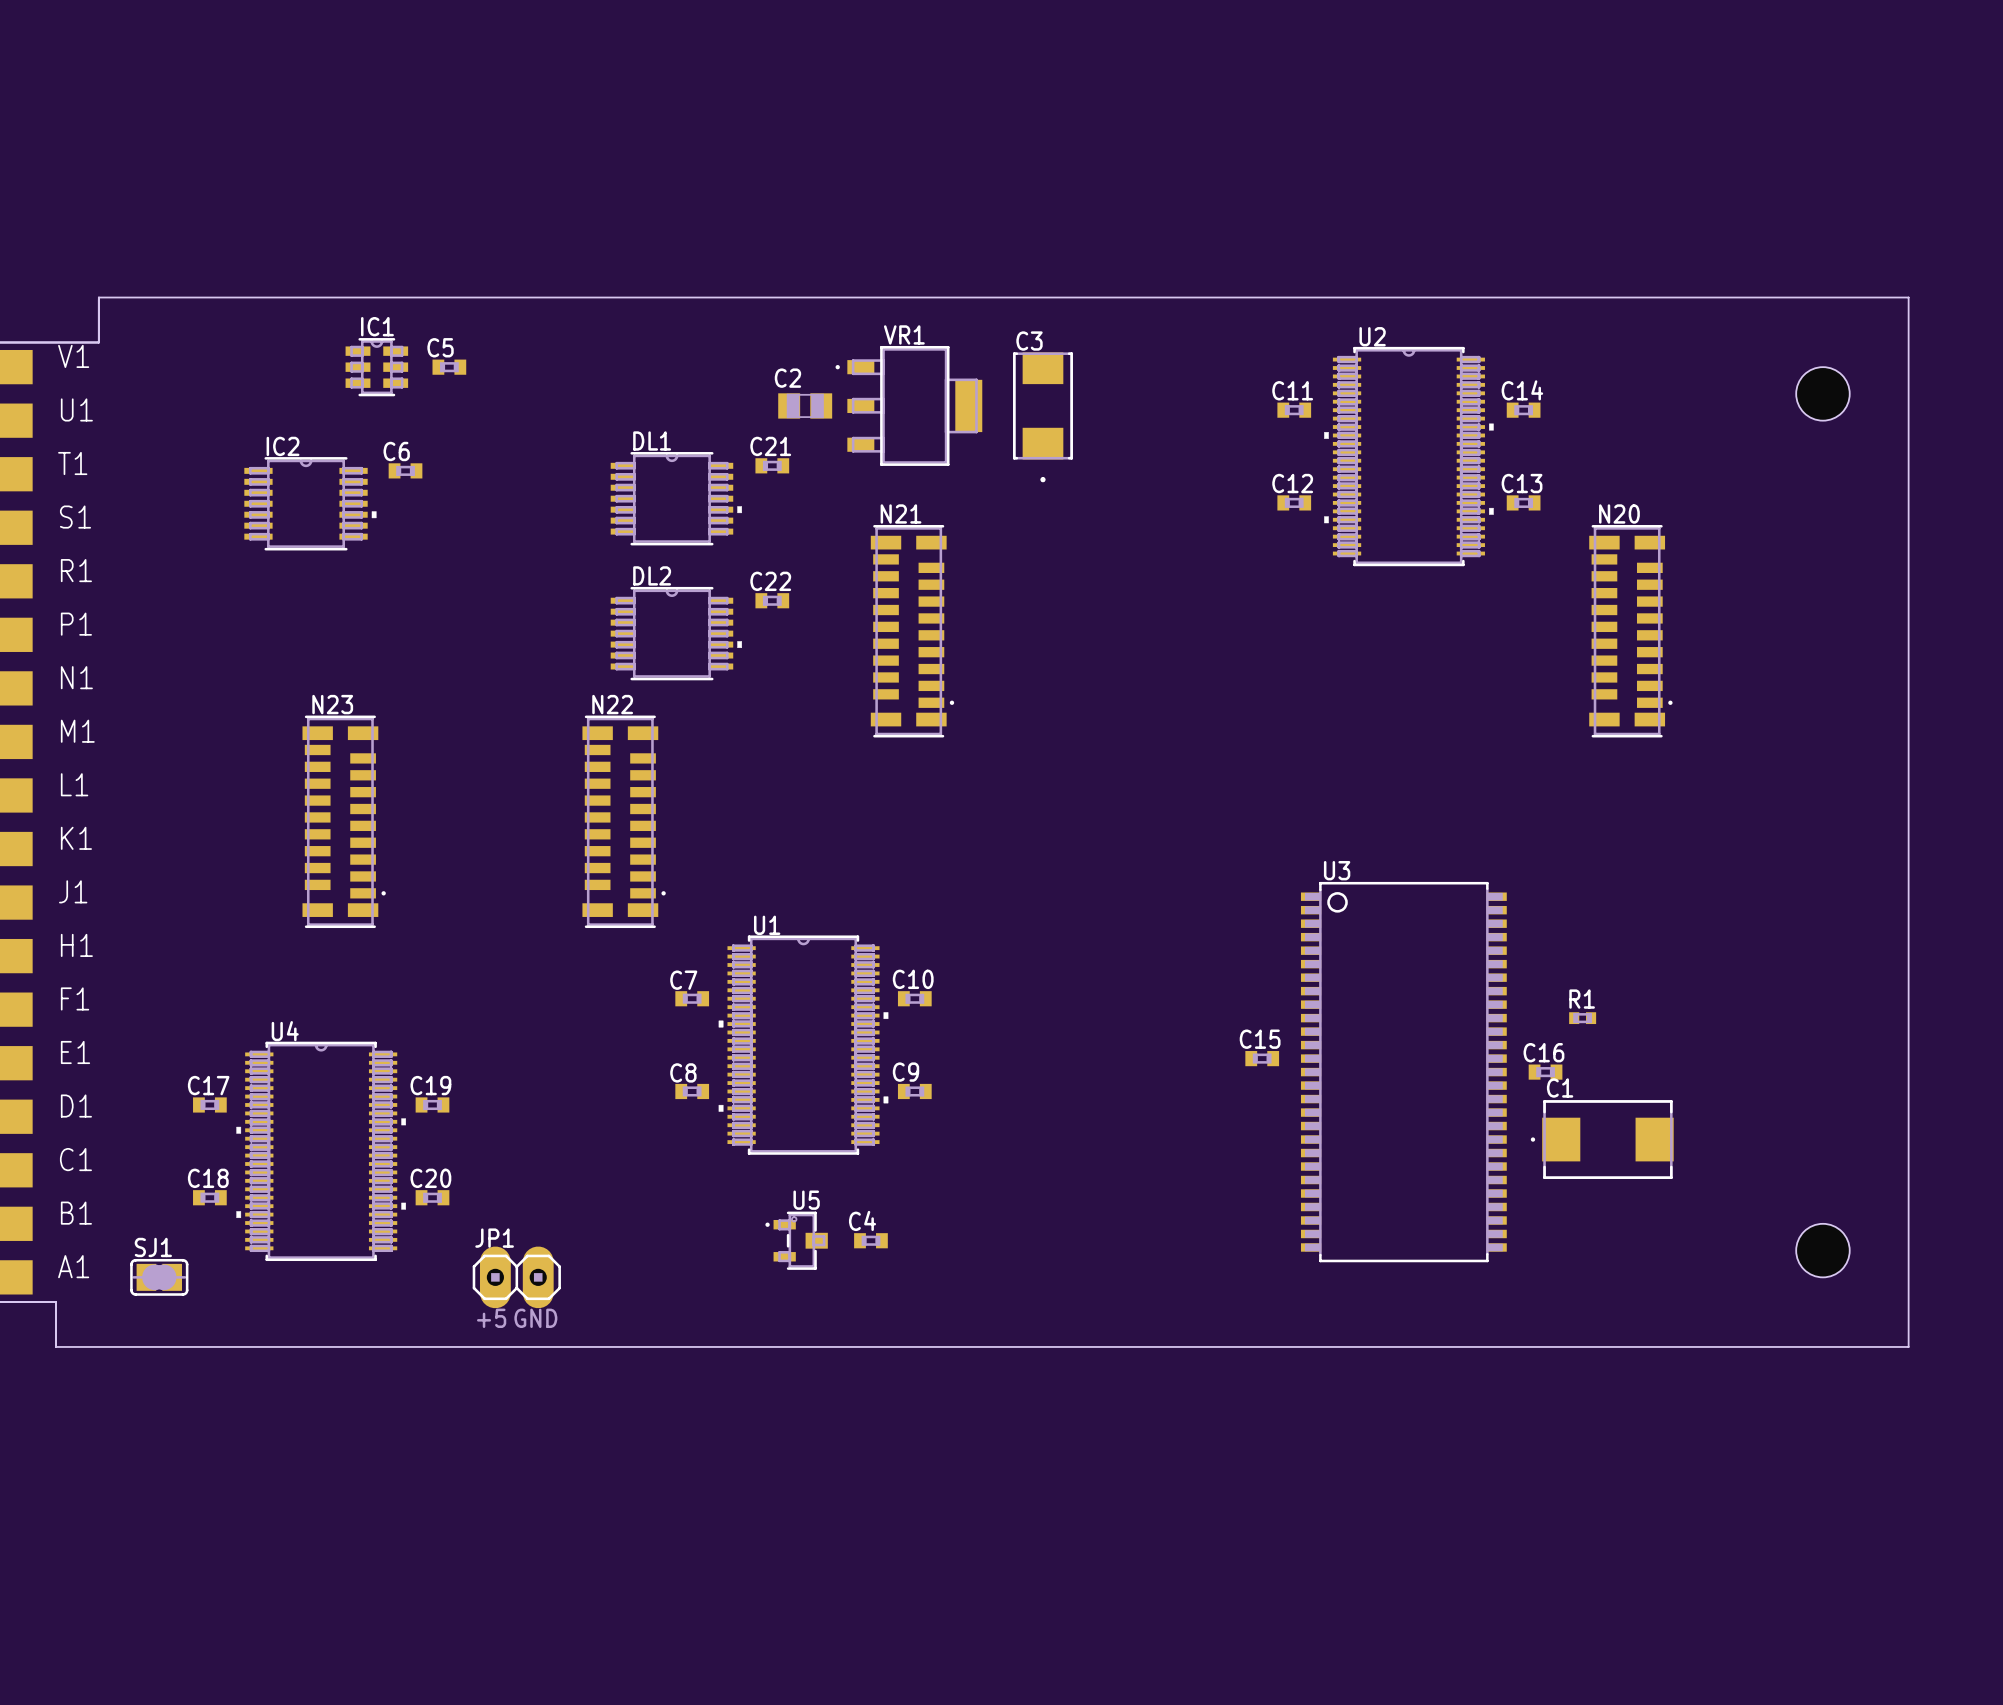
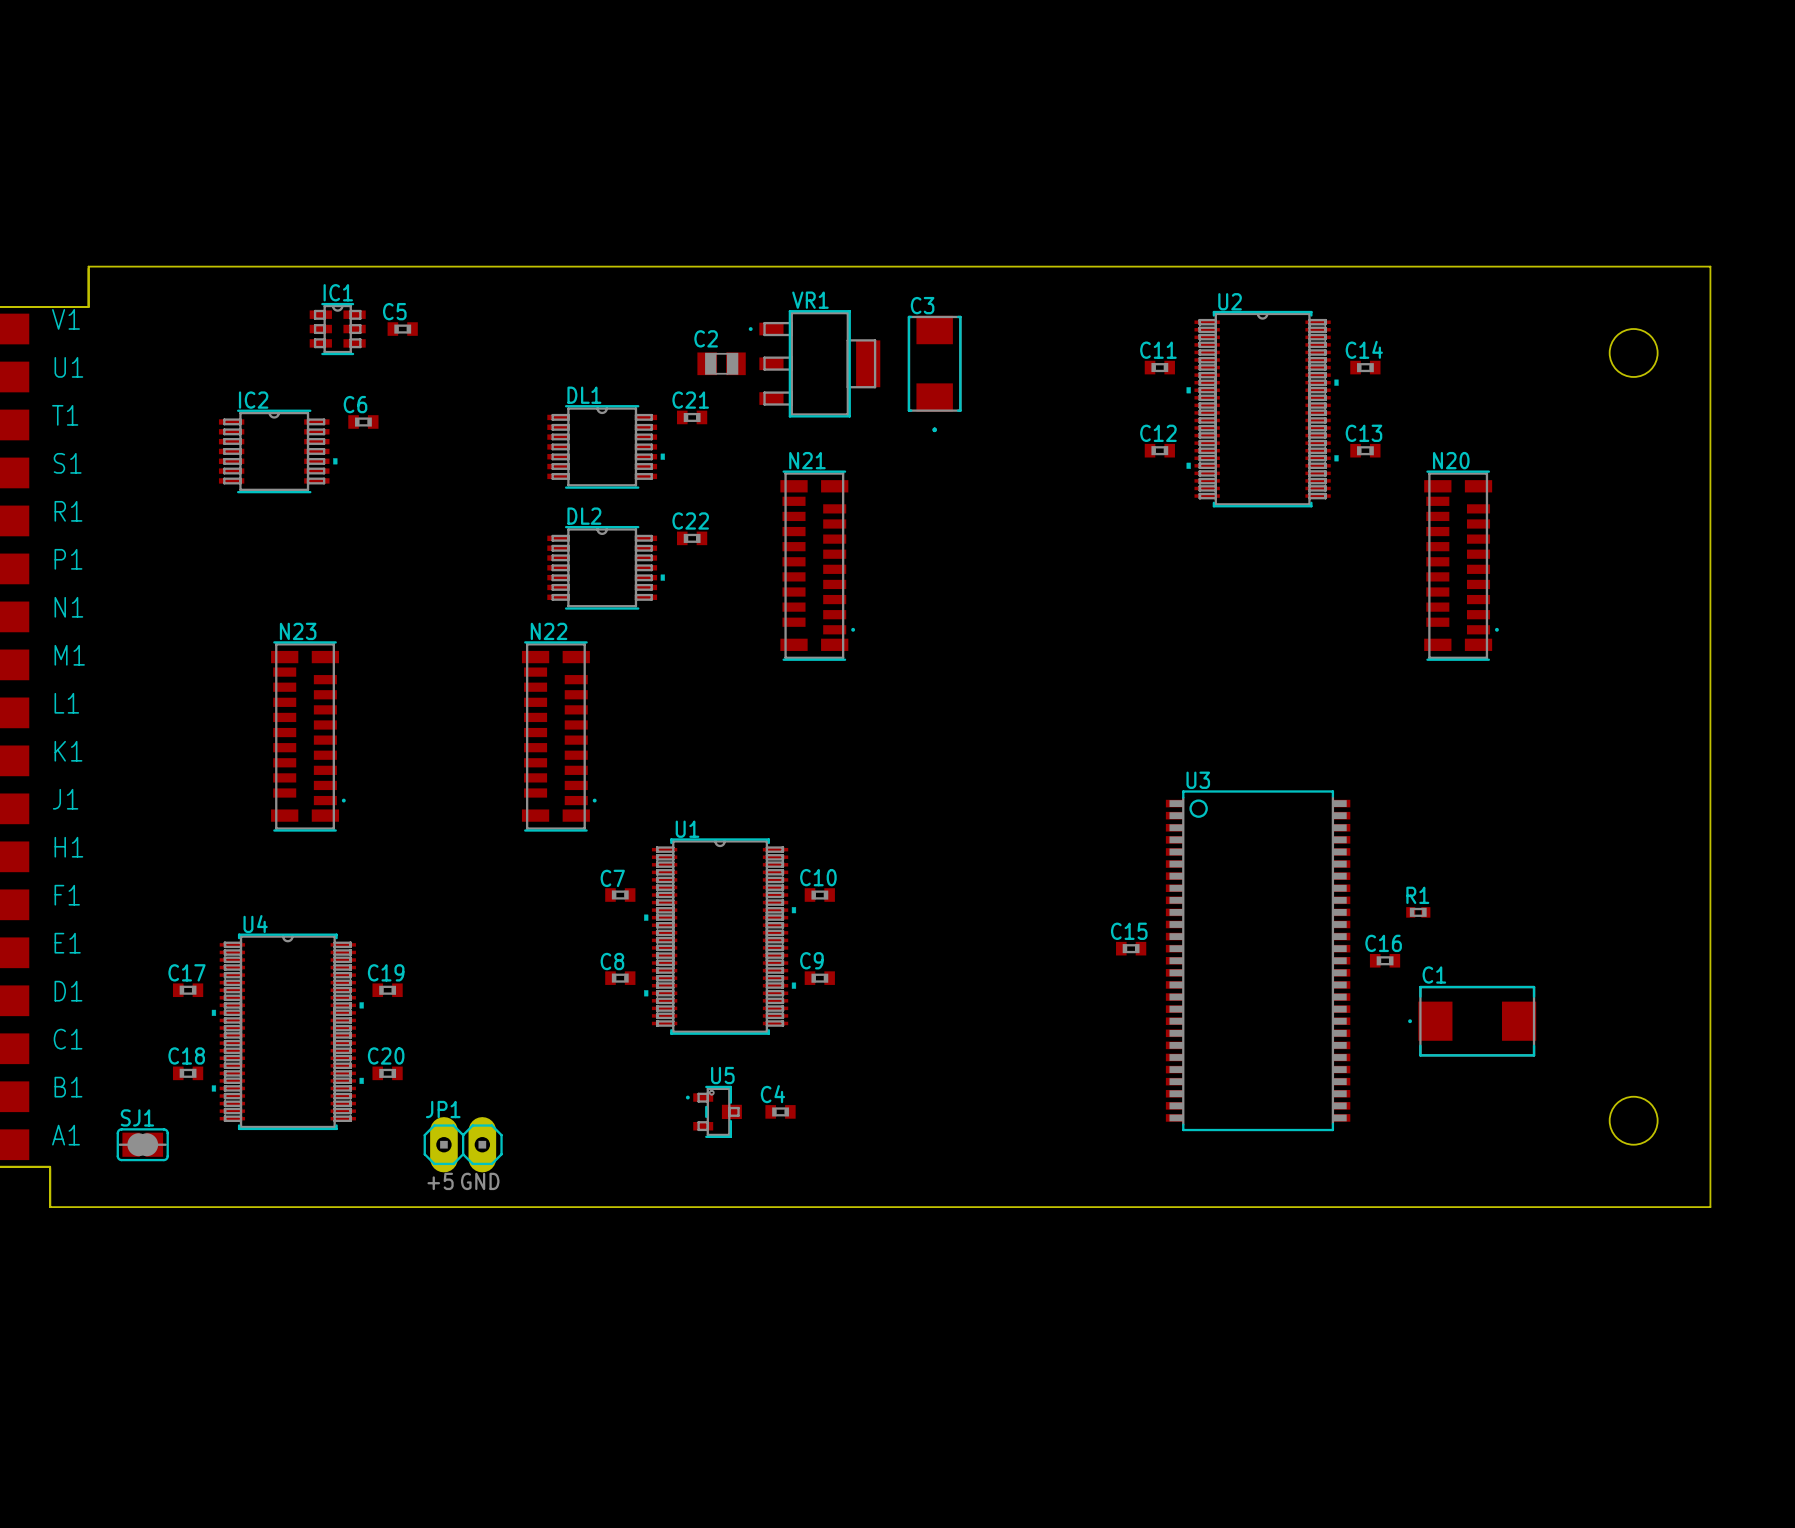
C1 position: (1602, 1139) -> (1472, 1021)

